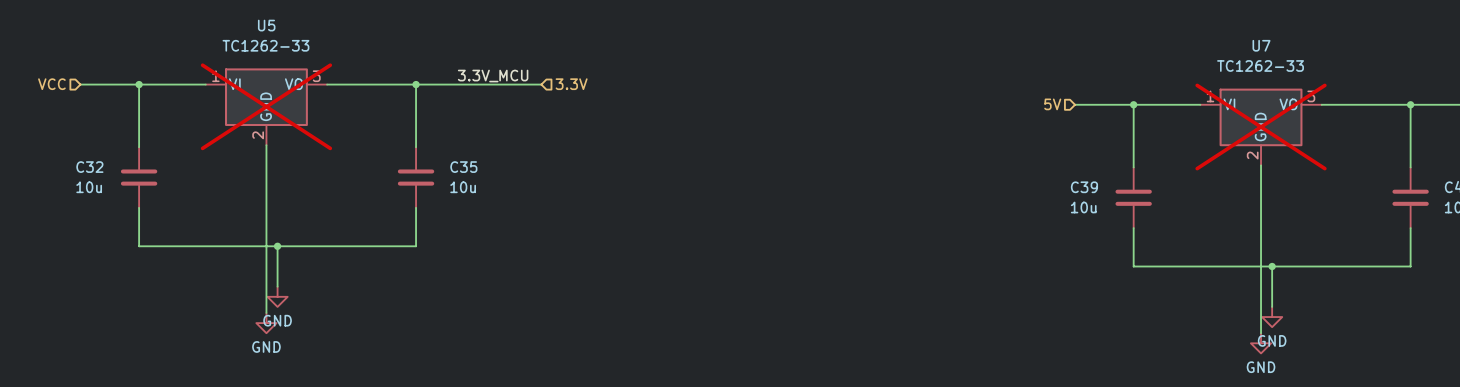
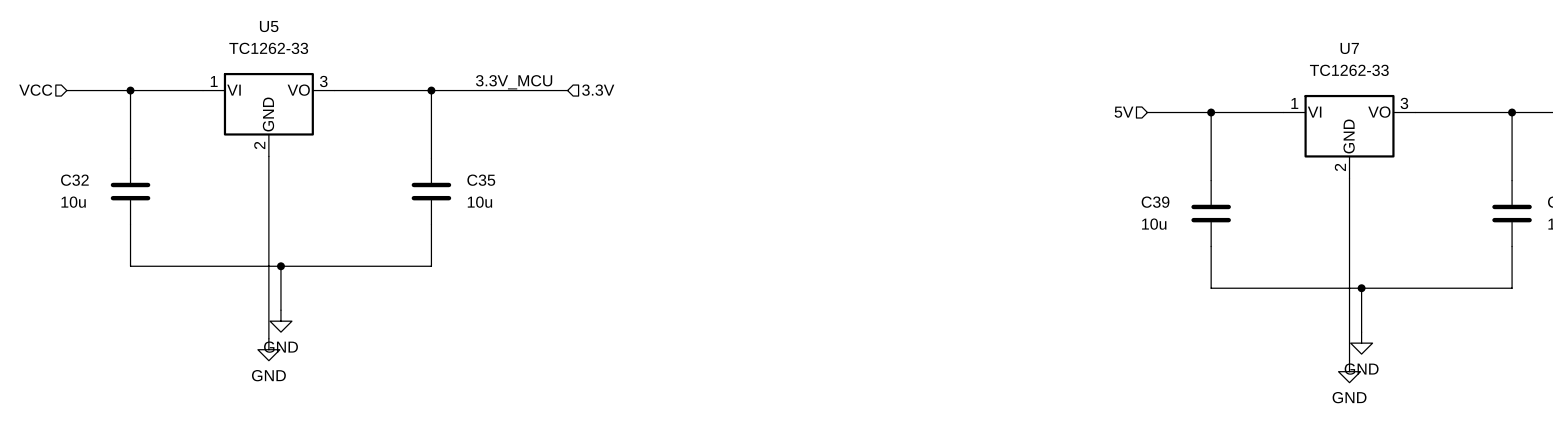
U5 do-not-place cross: (266, 106) -> none
U7 do-not-place cross: (1261, 127) -> none

